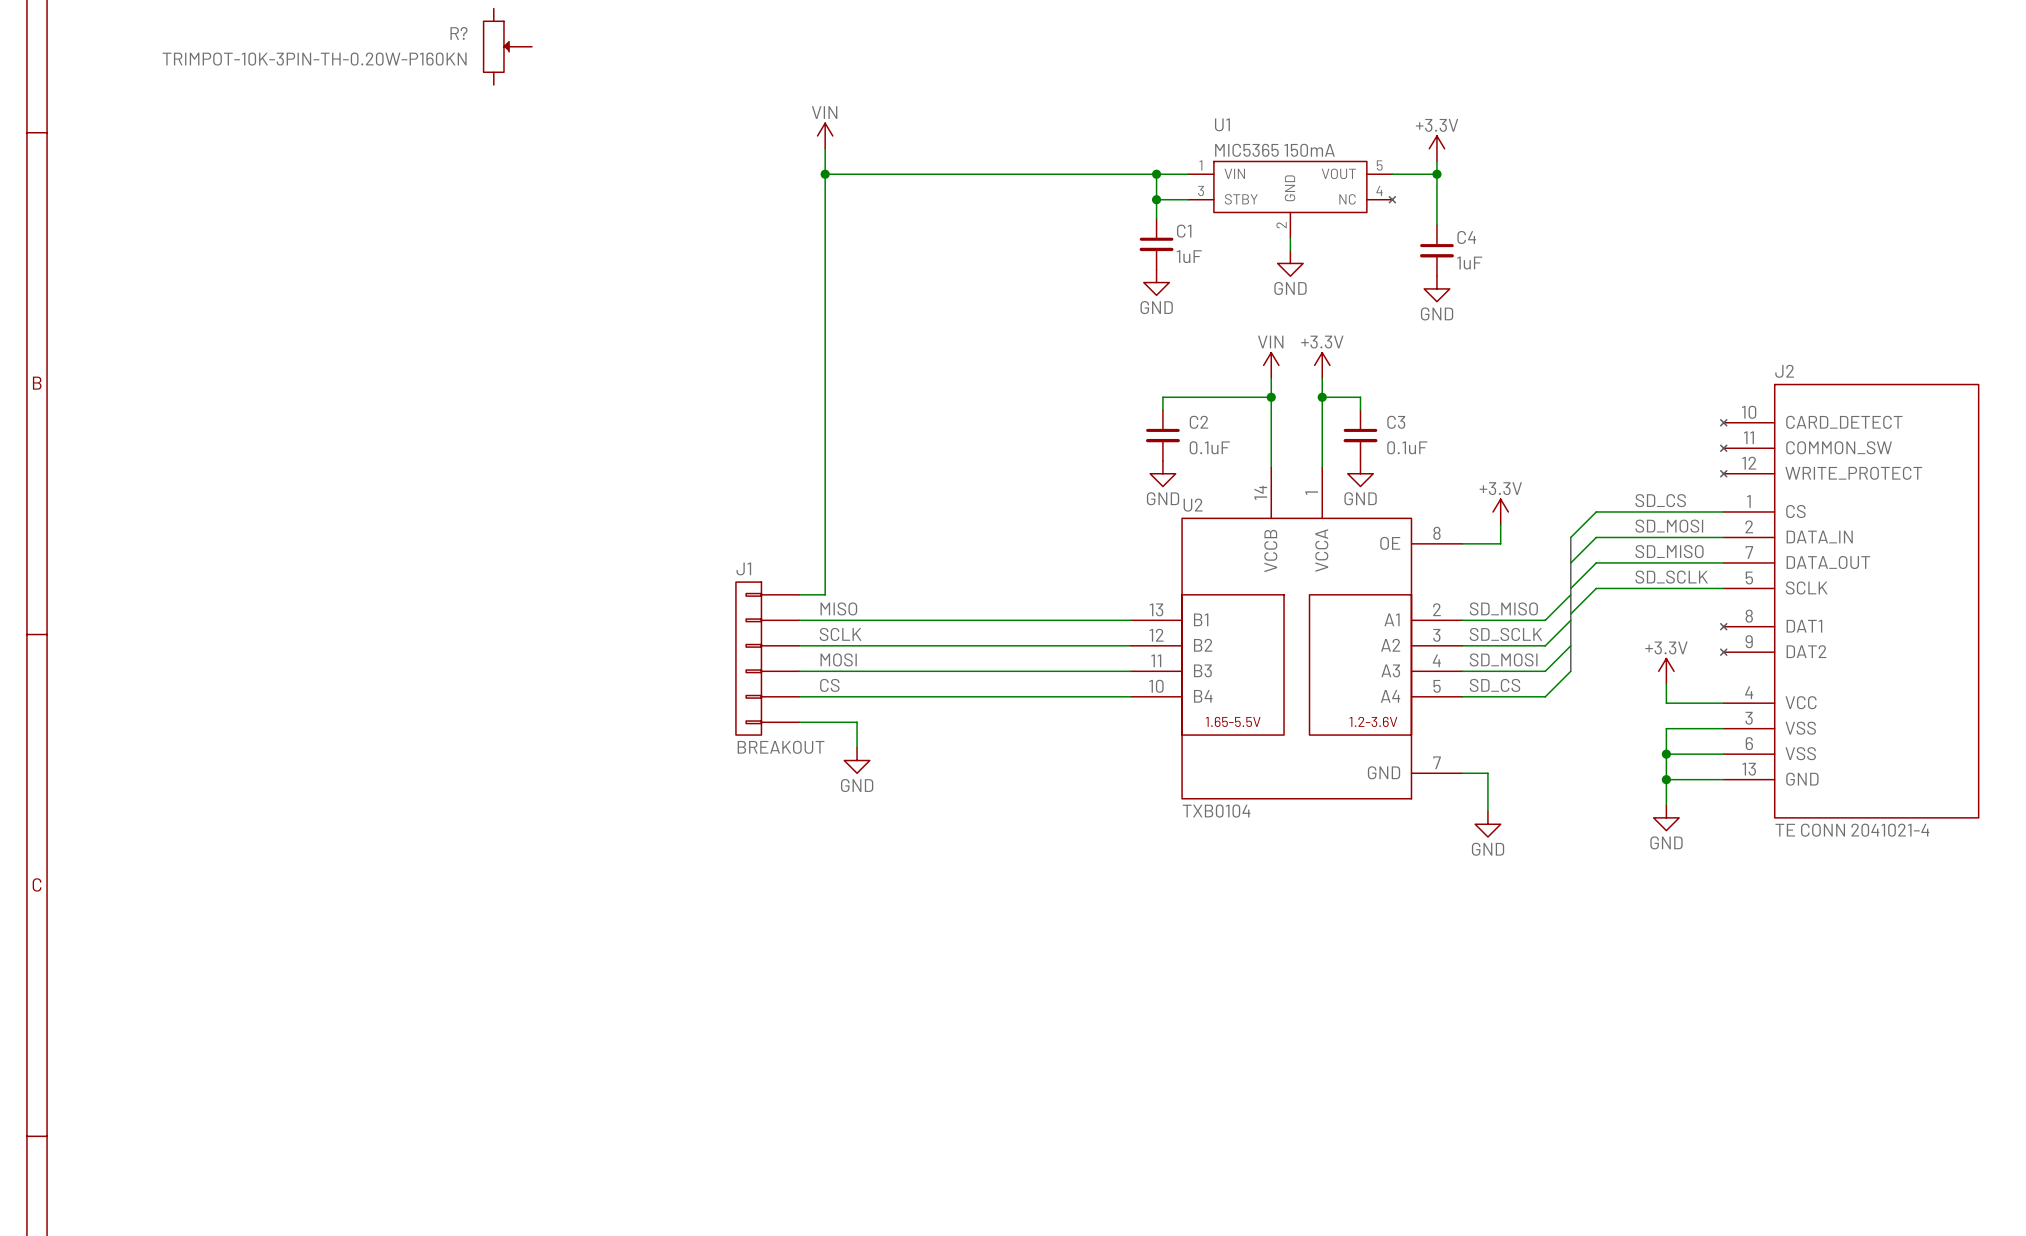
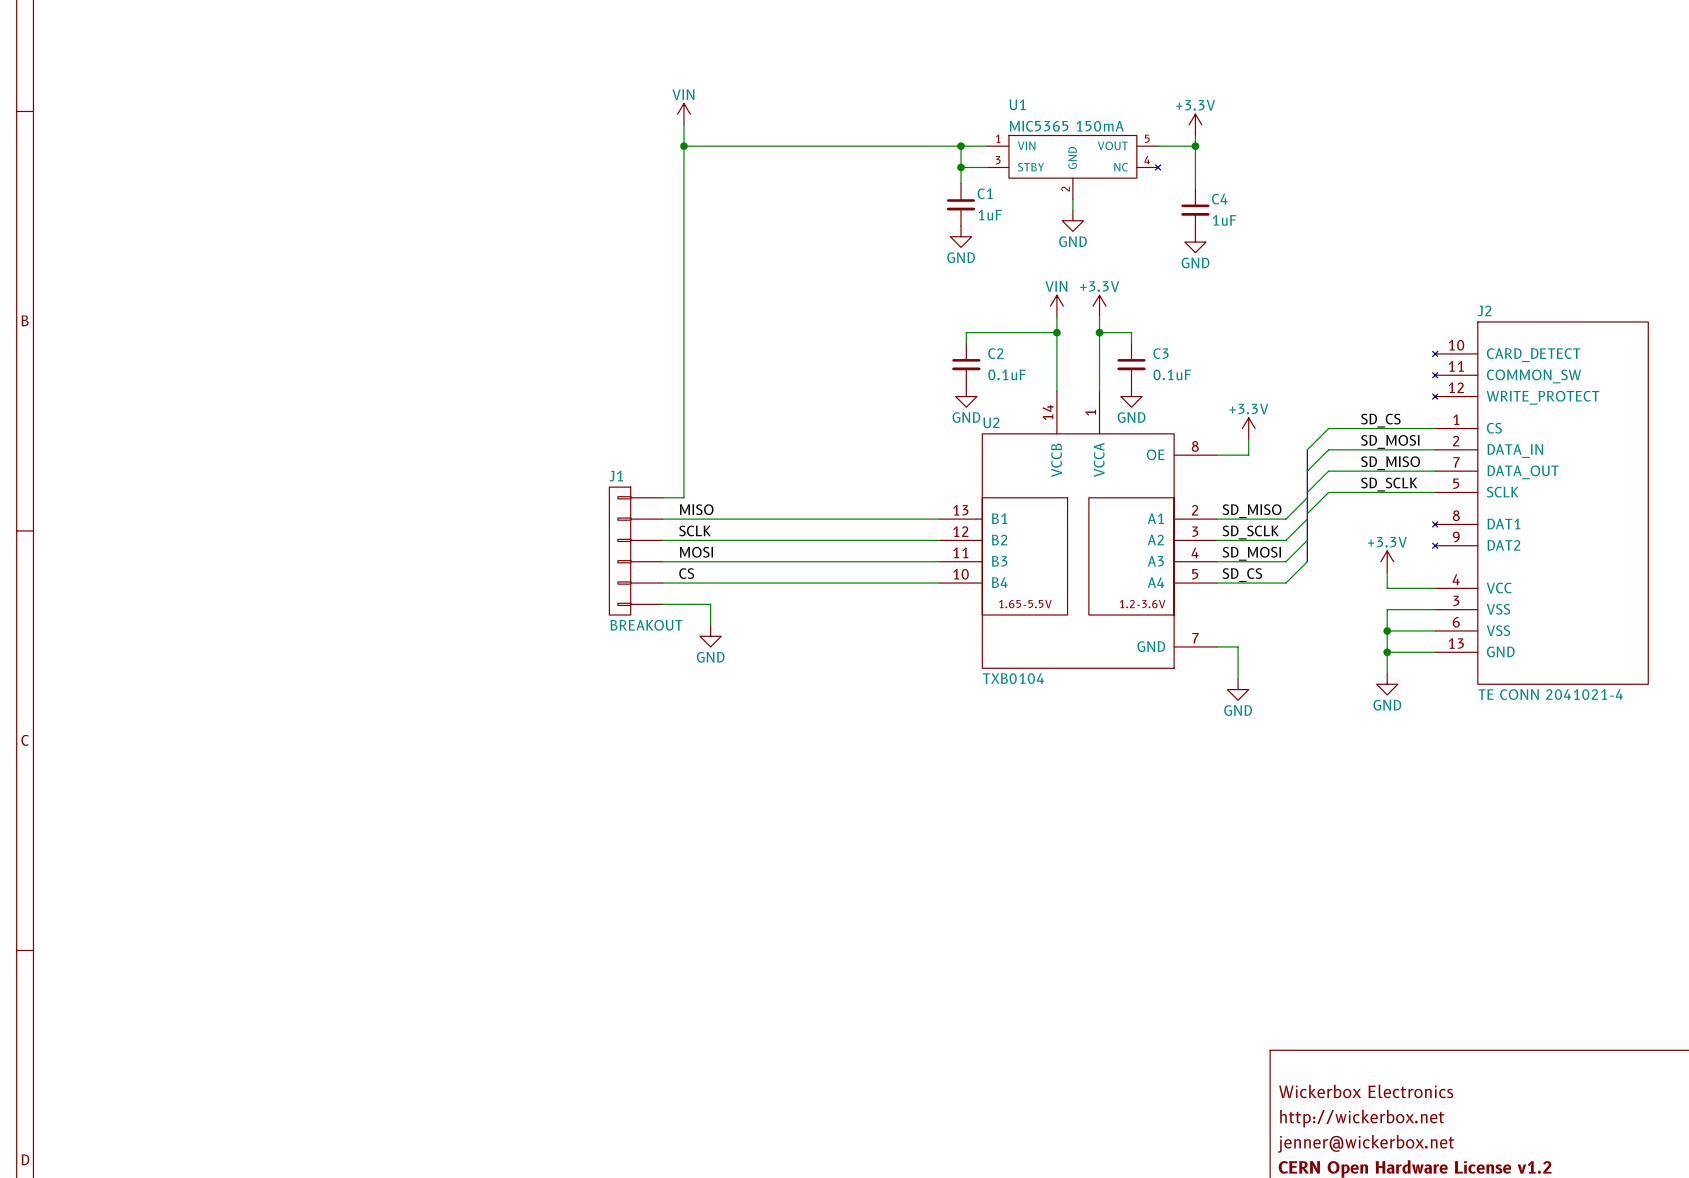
R?: TRIMPOT-10K-3PIN-TH-0.20W-P160KN (507, 46) -> none

